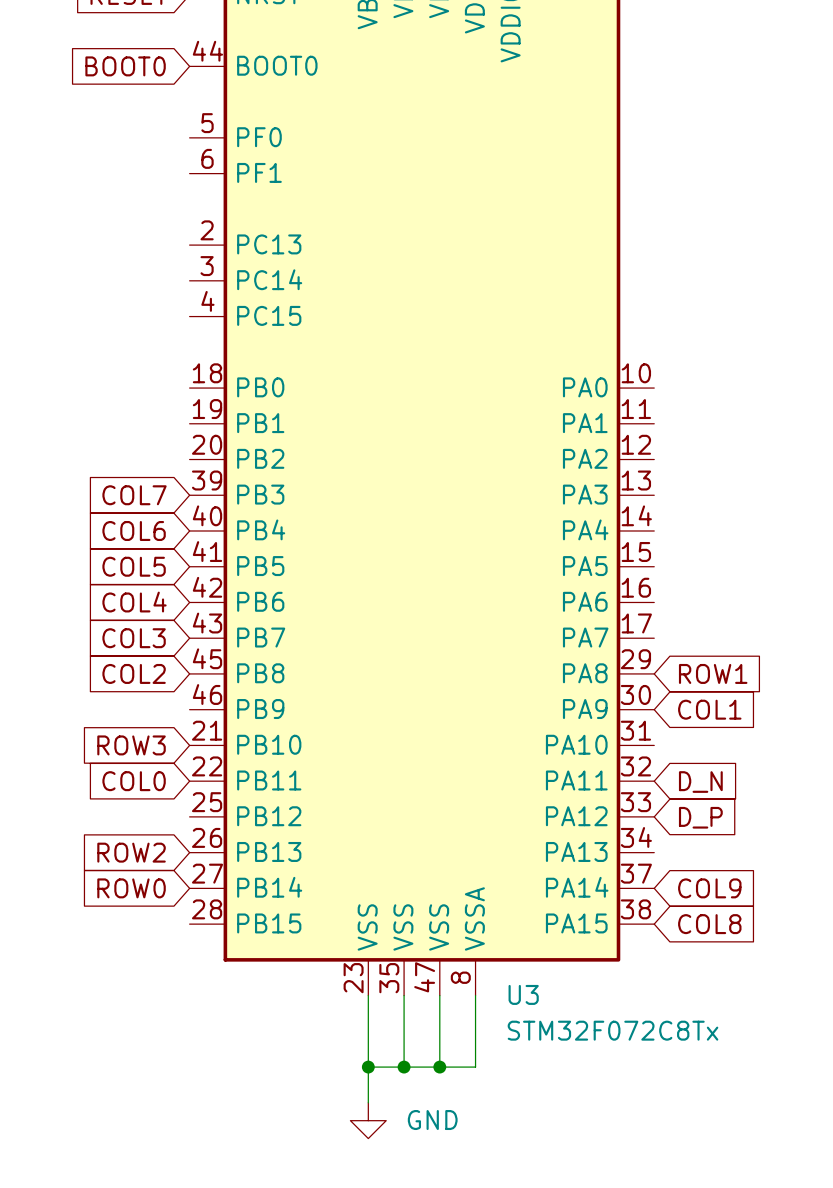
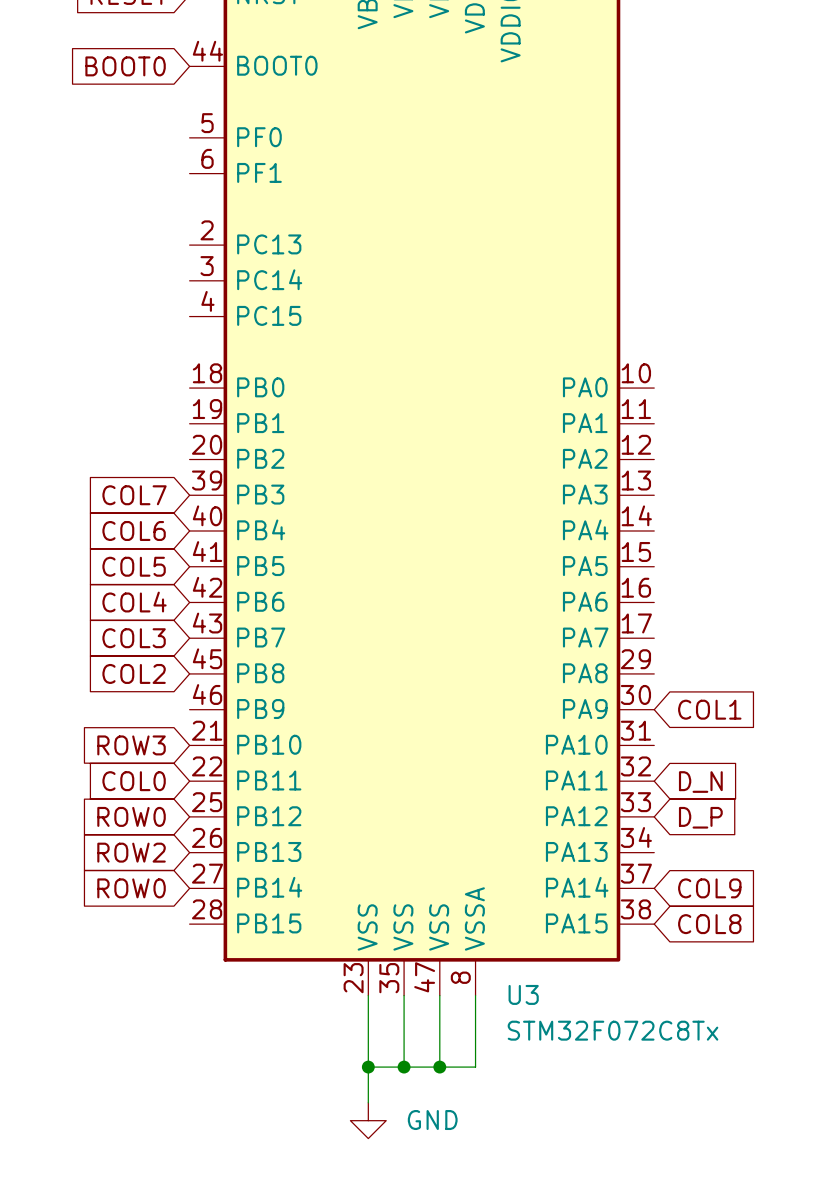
global label: ROW1 (713, 673) -> none
global label: none -> ROW0 (131, 816)

